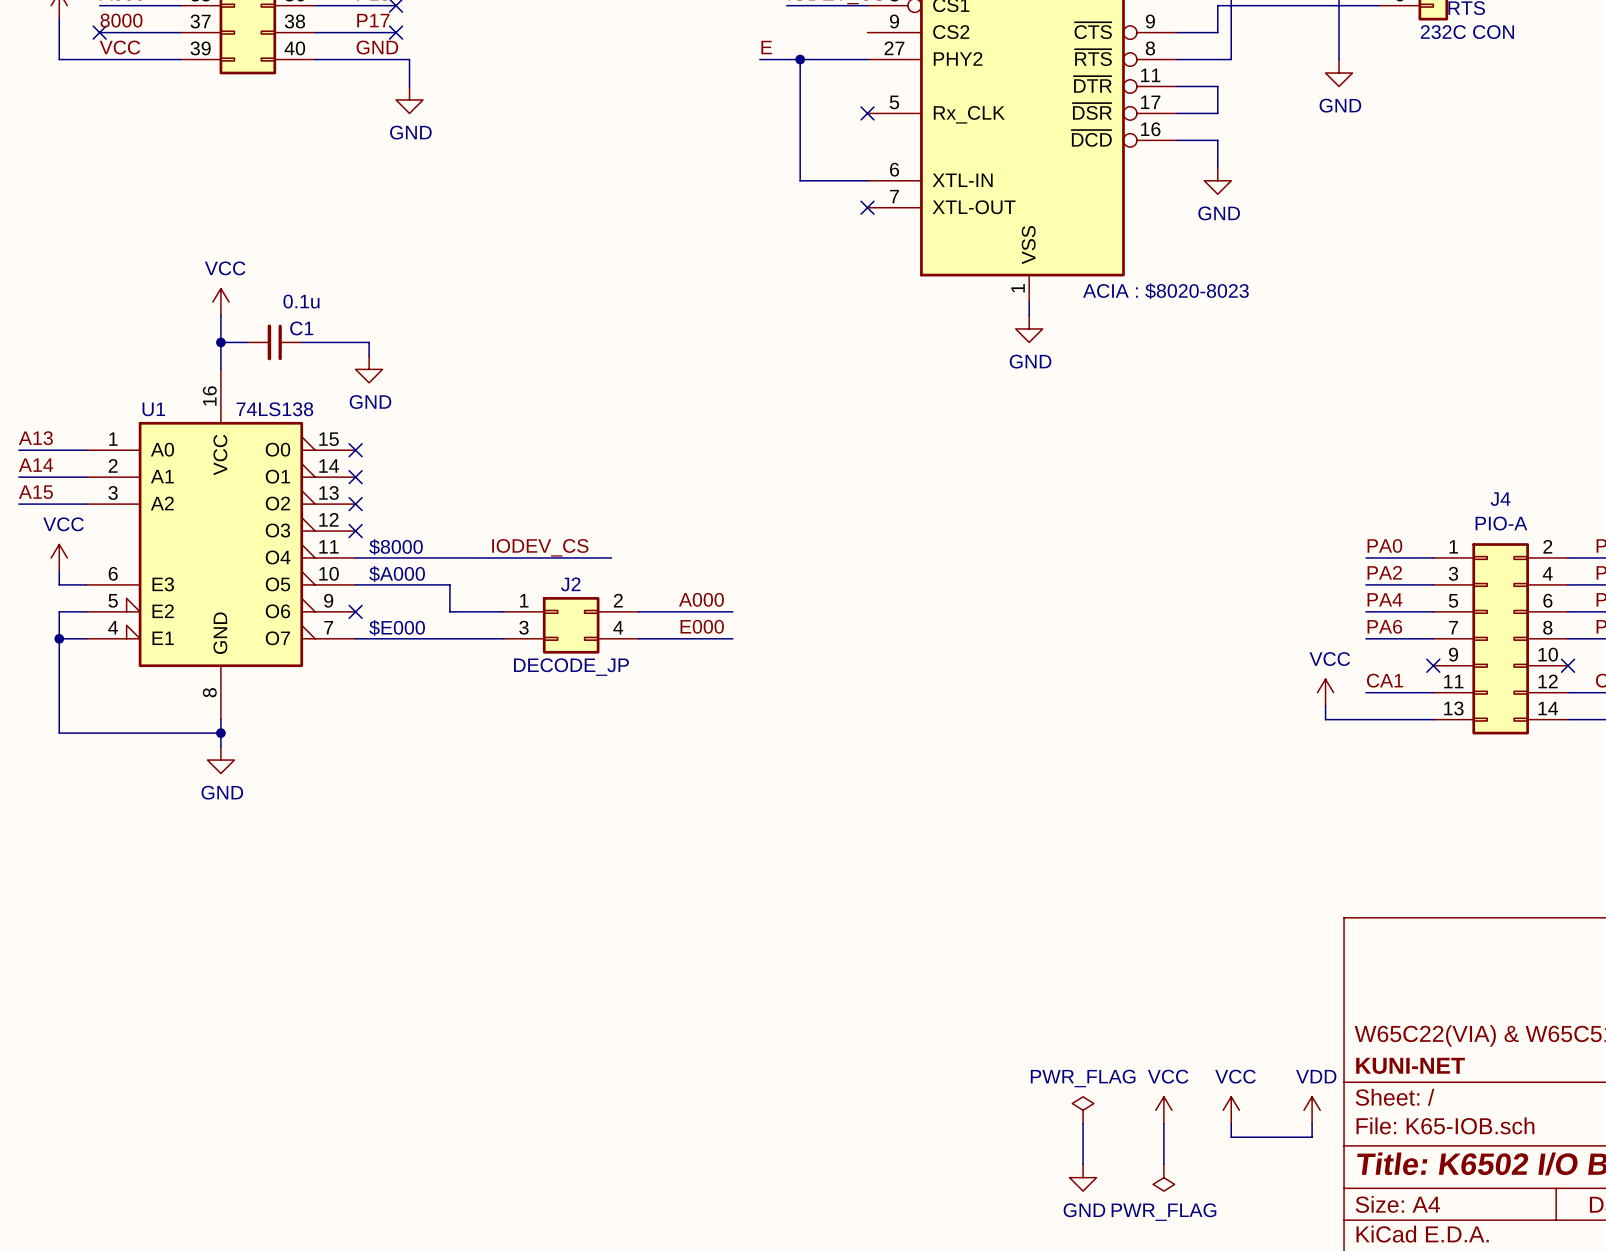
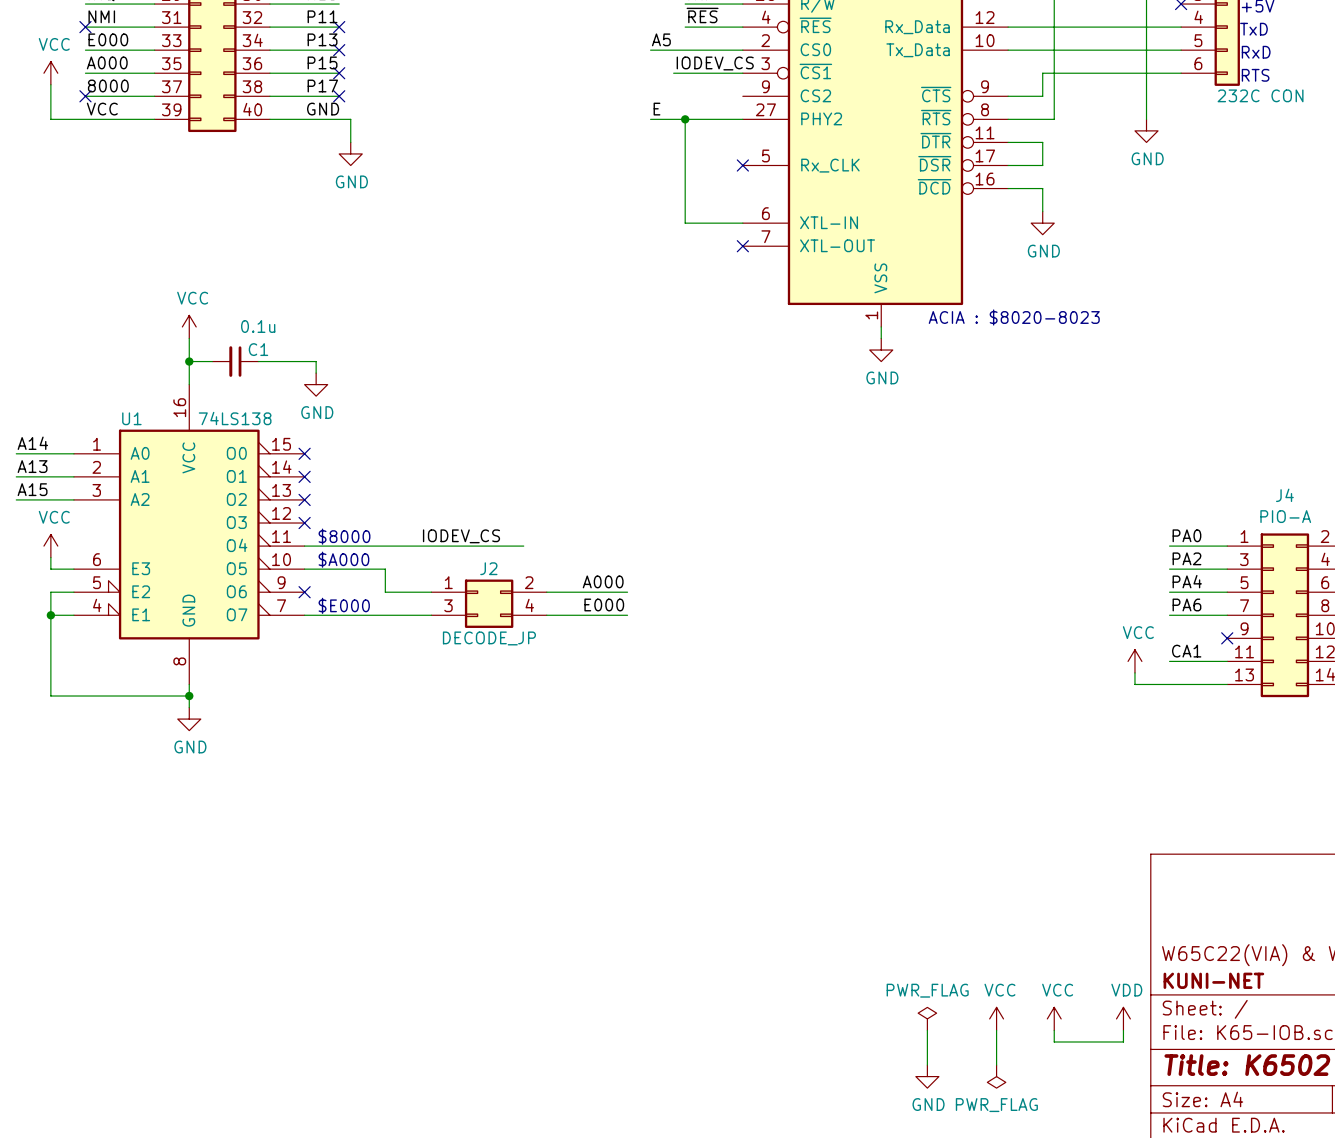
label: A13 (35, 438) -> A14 (32, 443)
label: A14 (36, 465) -> A13 (32, 466)

